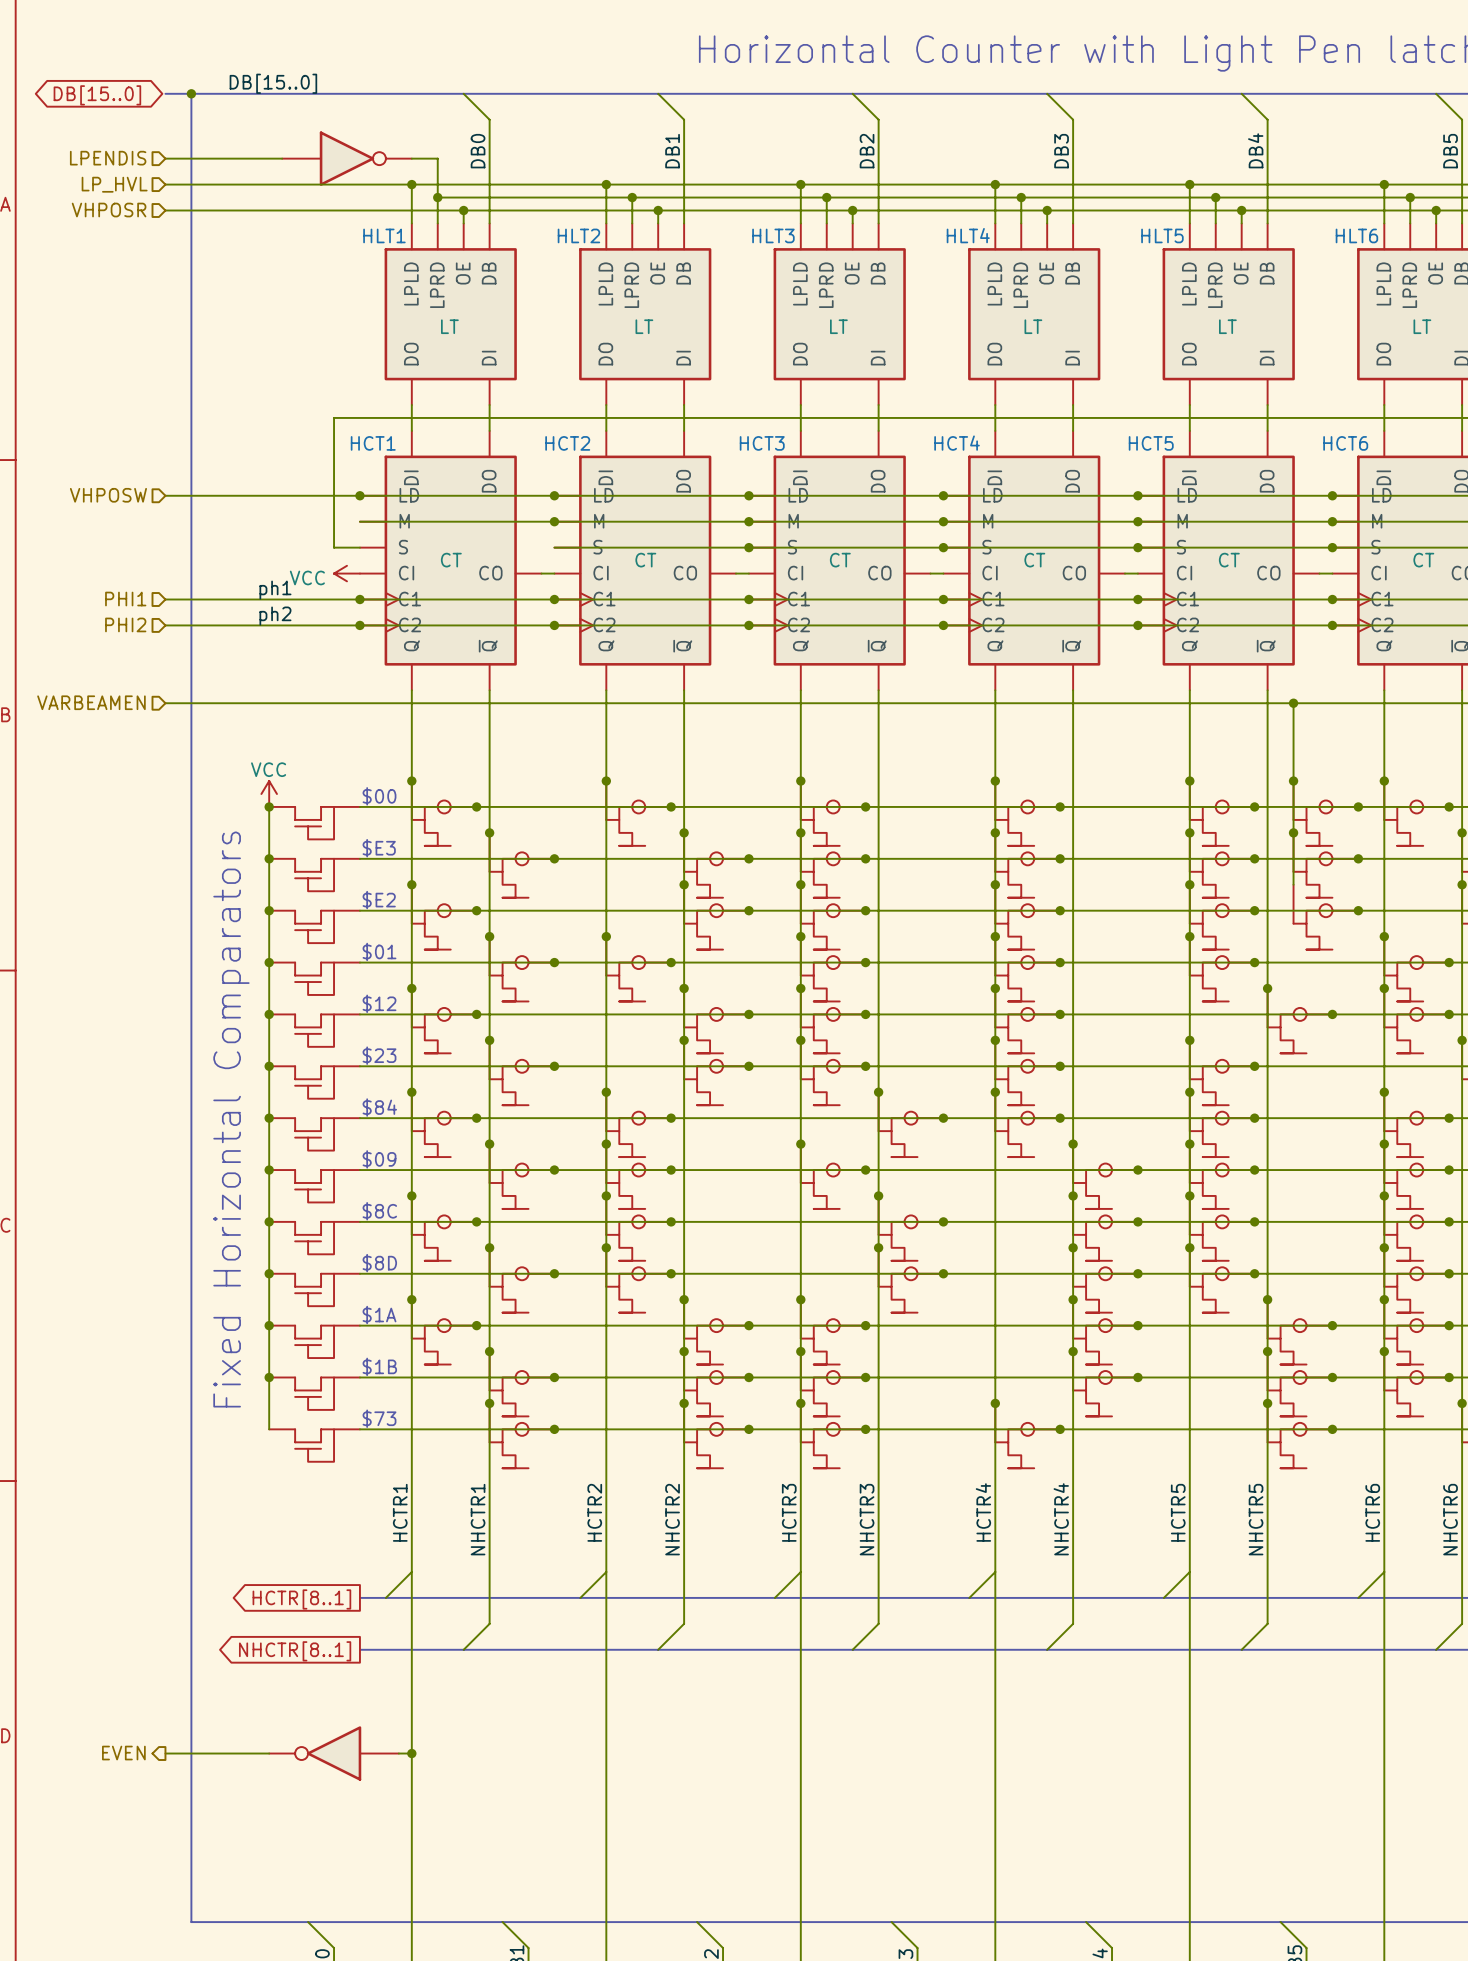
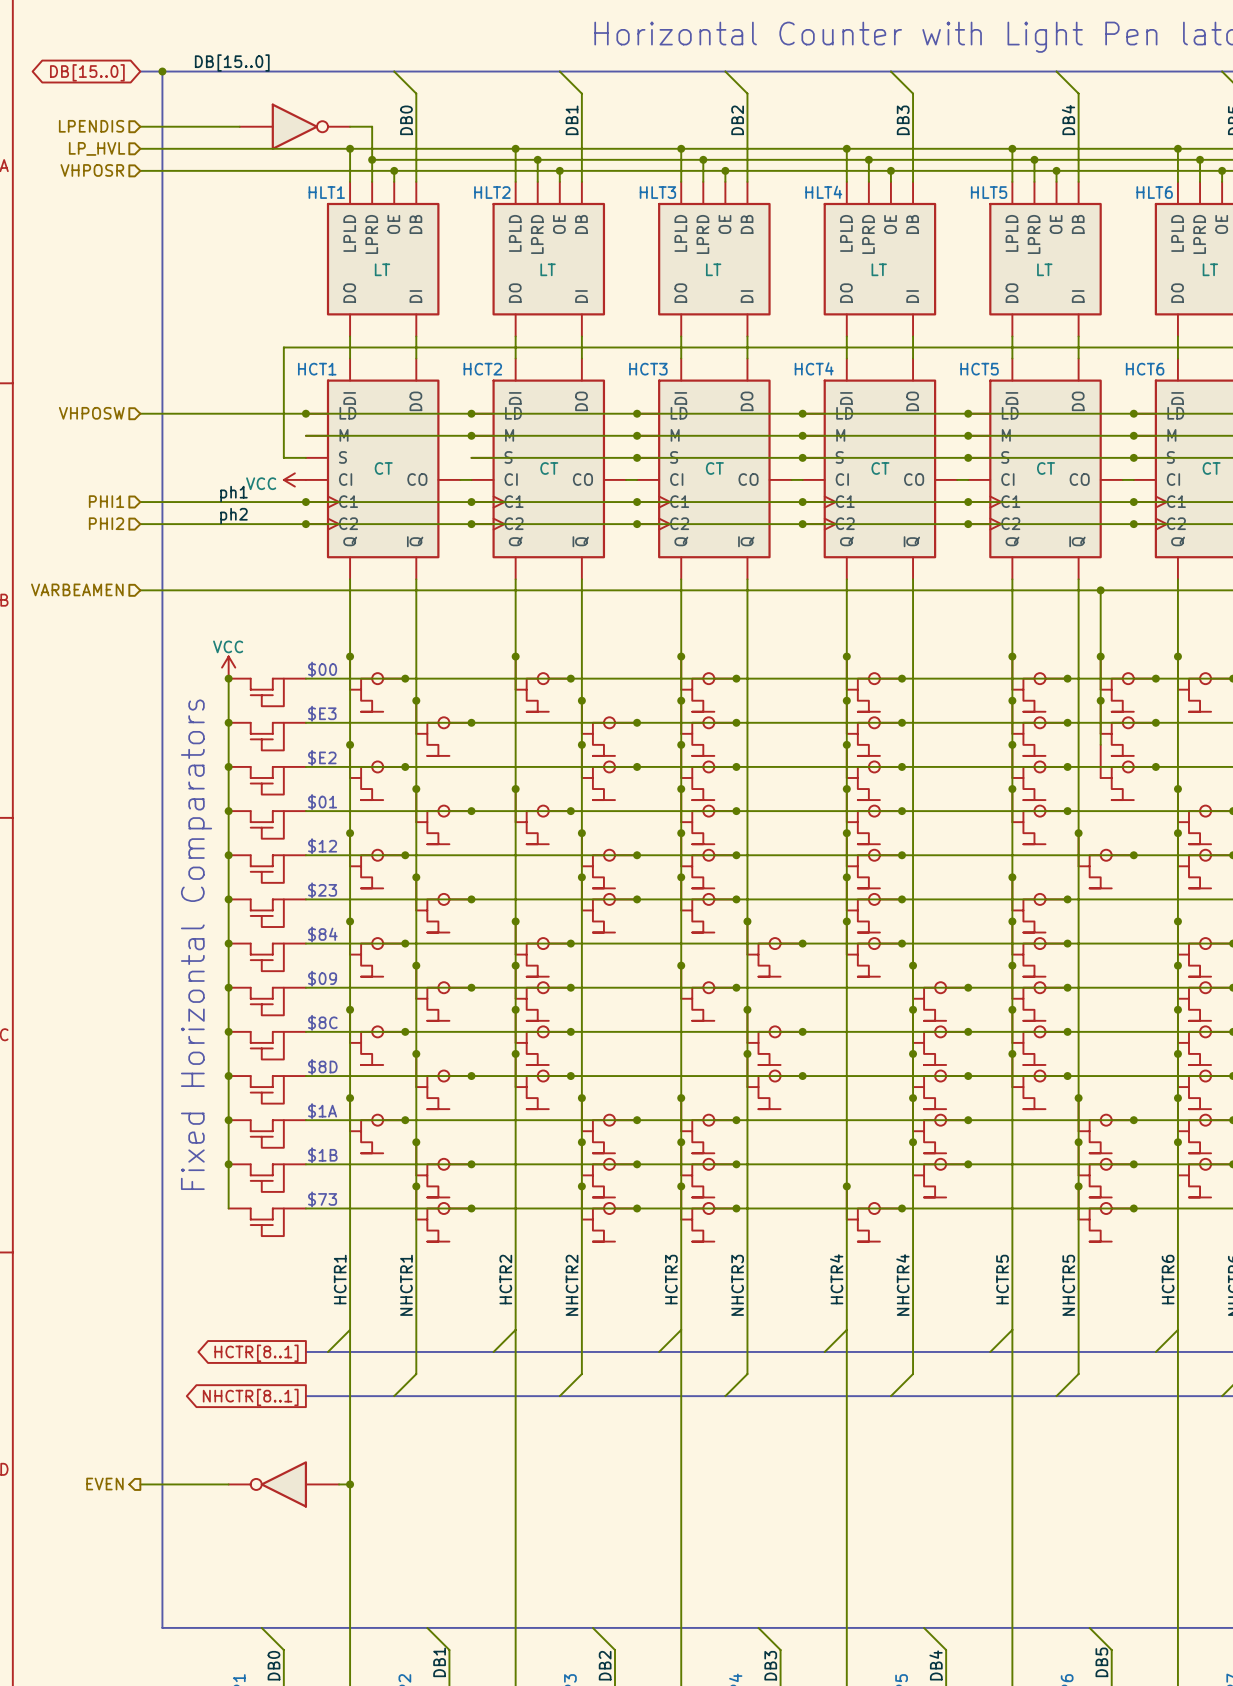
global label rotation: 0° (97, 95) -> 180° (87, 72)

